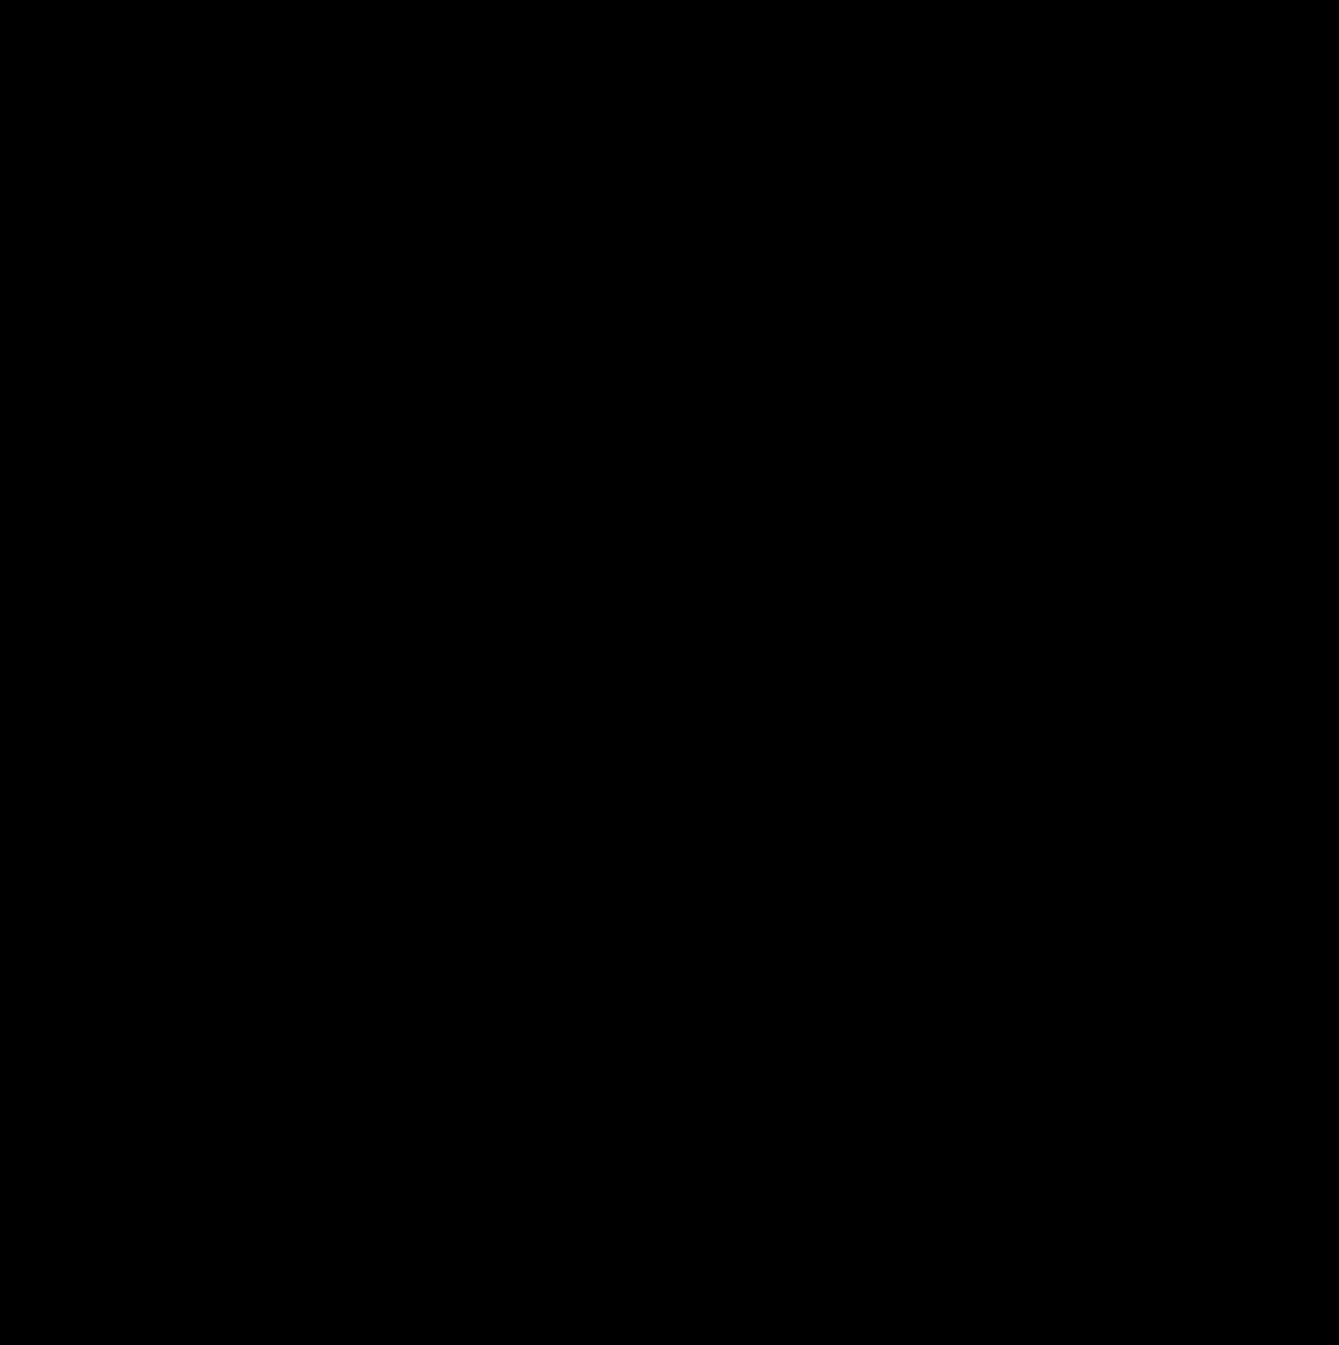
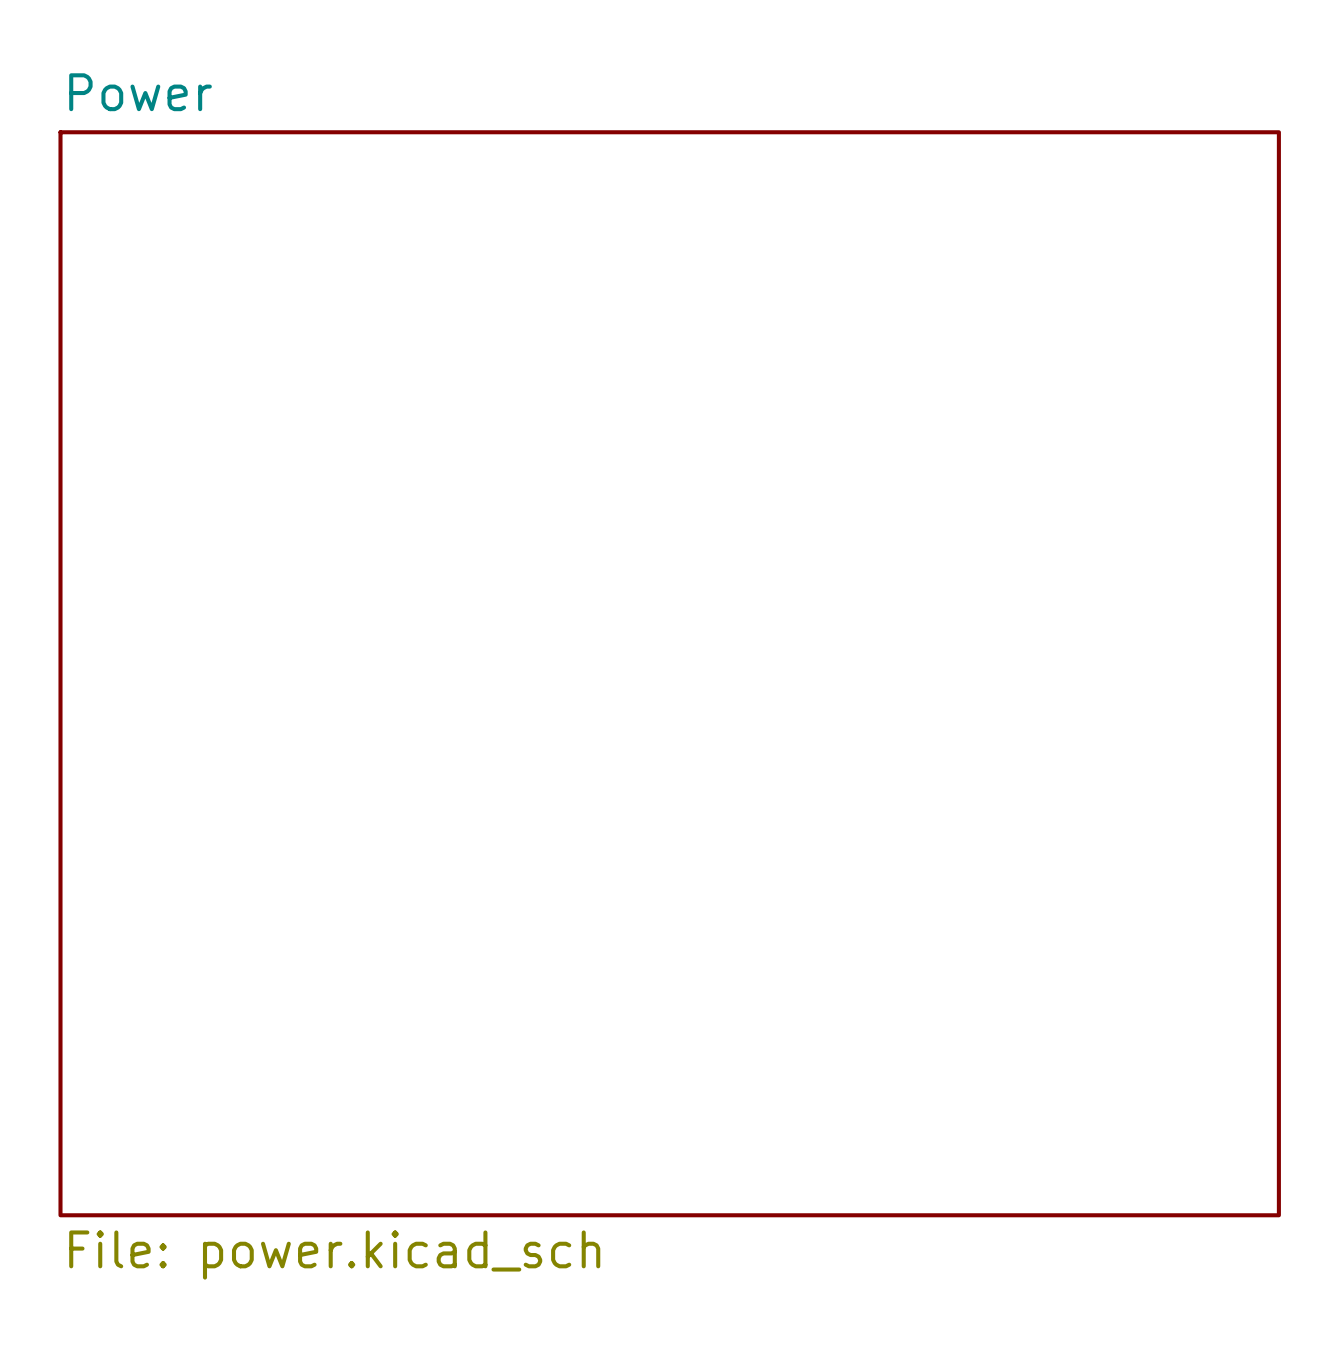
sheet Power: none -> File: power.kicad_sch (669, 673)

